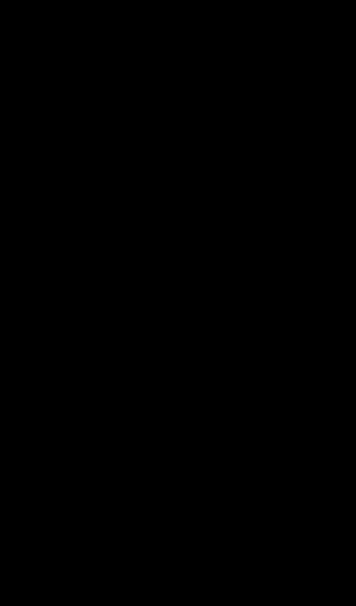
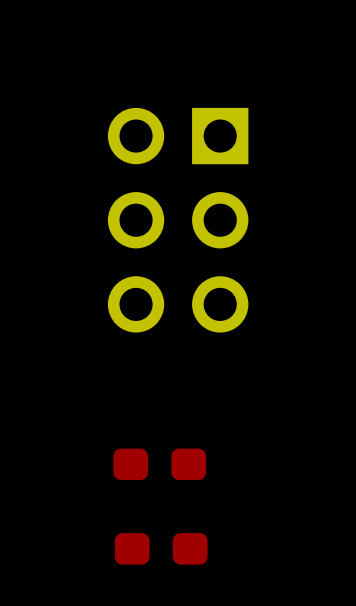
part: none -> (178, 220)
part: none -> (159, 464)
part: none -> (161, 548)

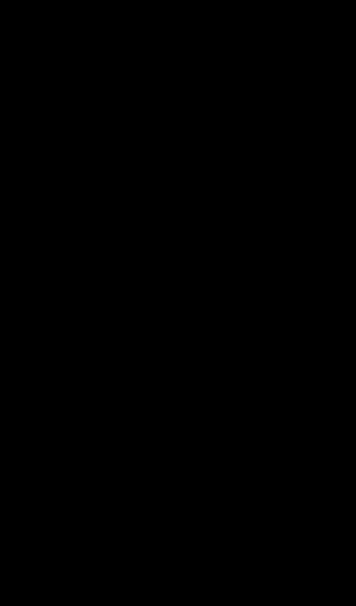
part: (178, 220) -> none
part: (159, 464) -> none
part: (161, 548) -> none

